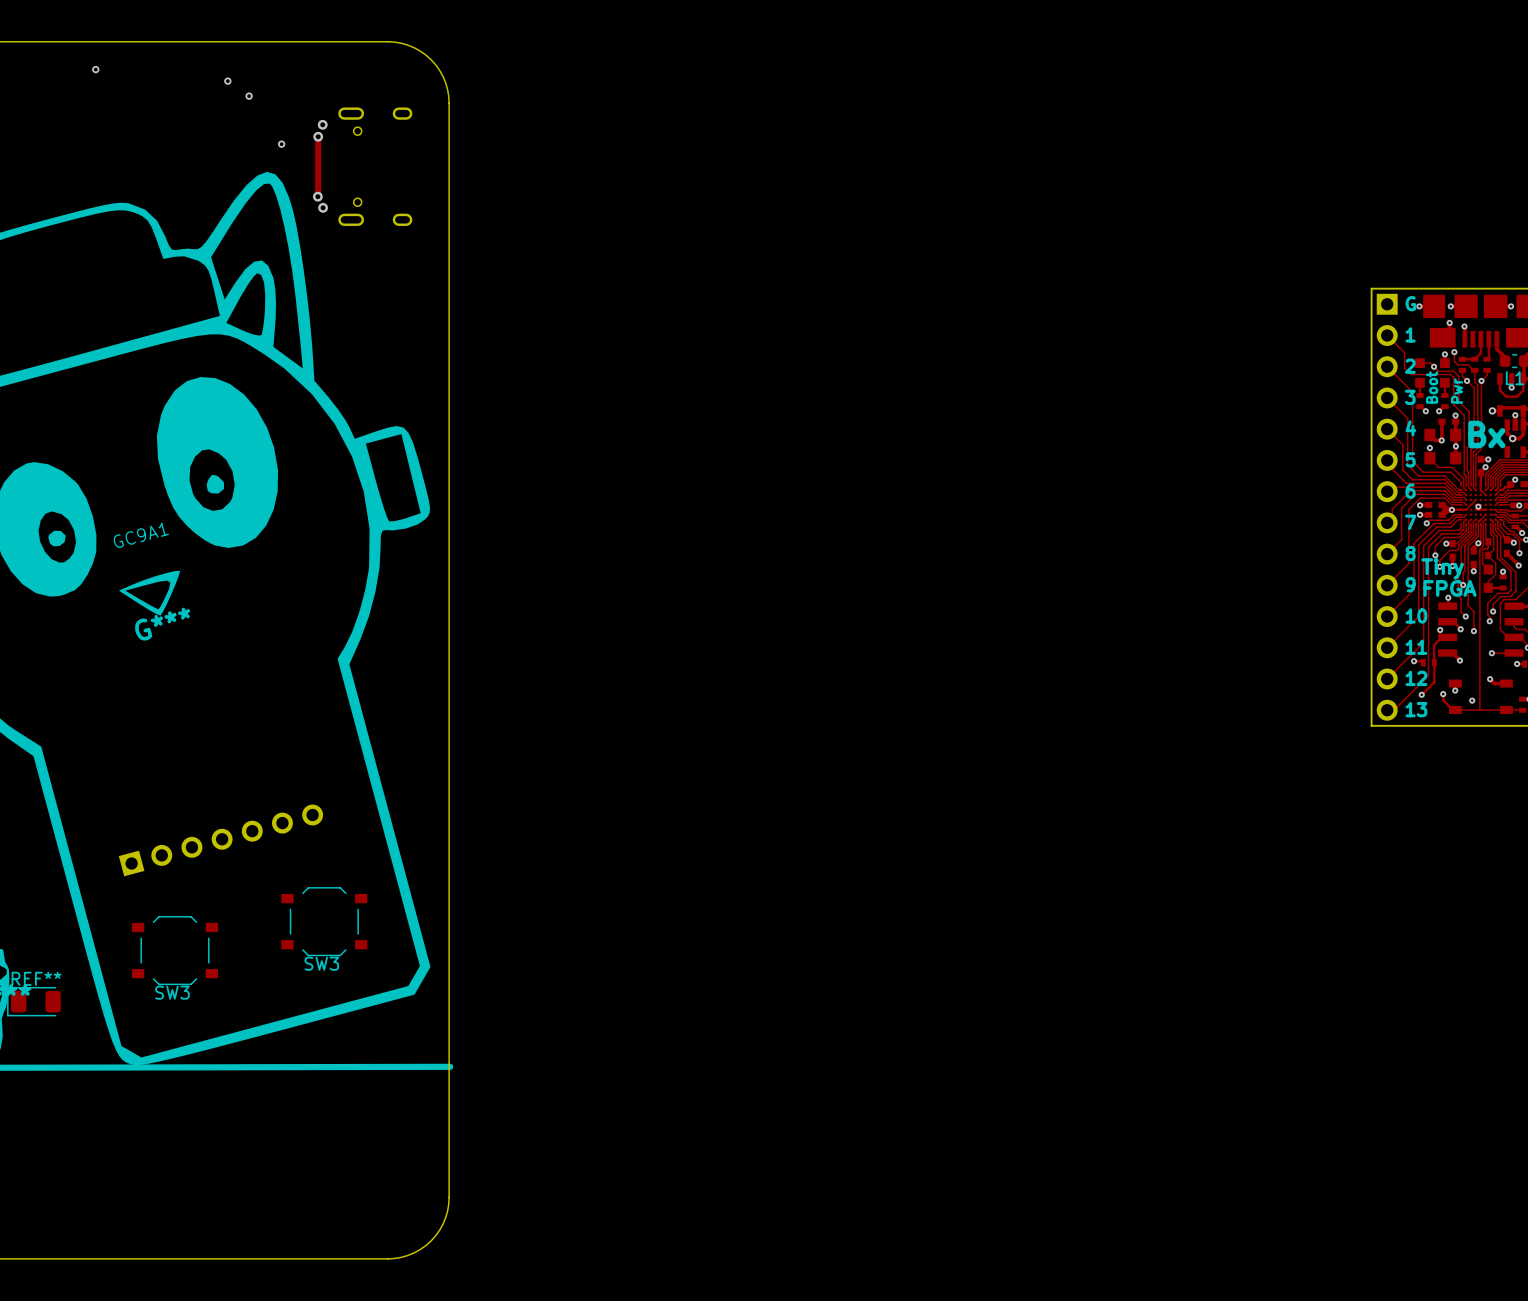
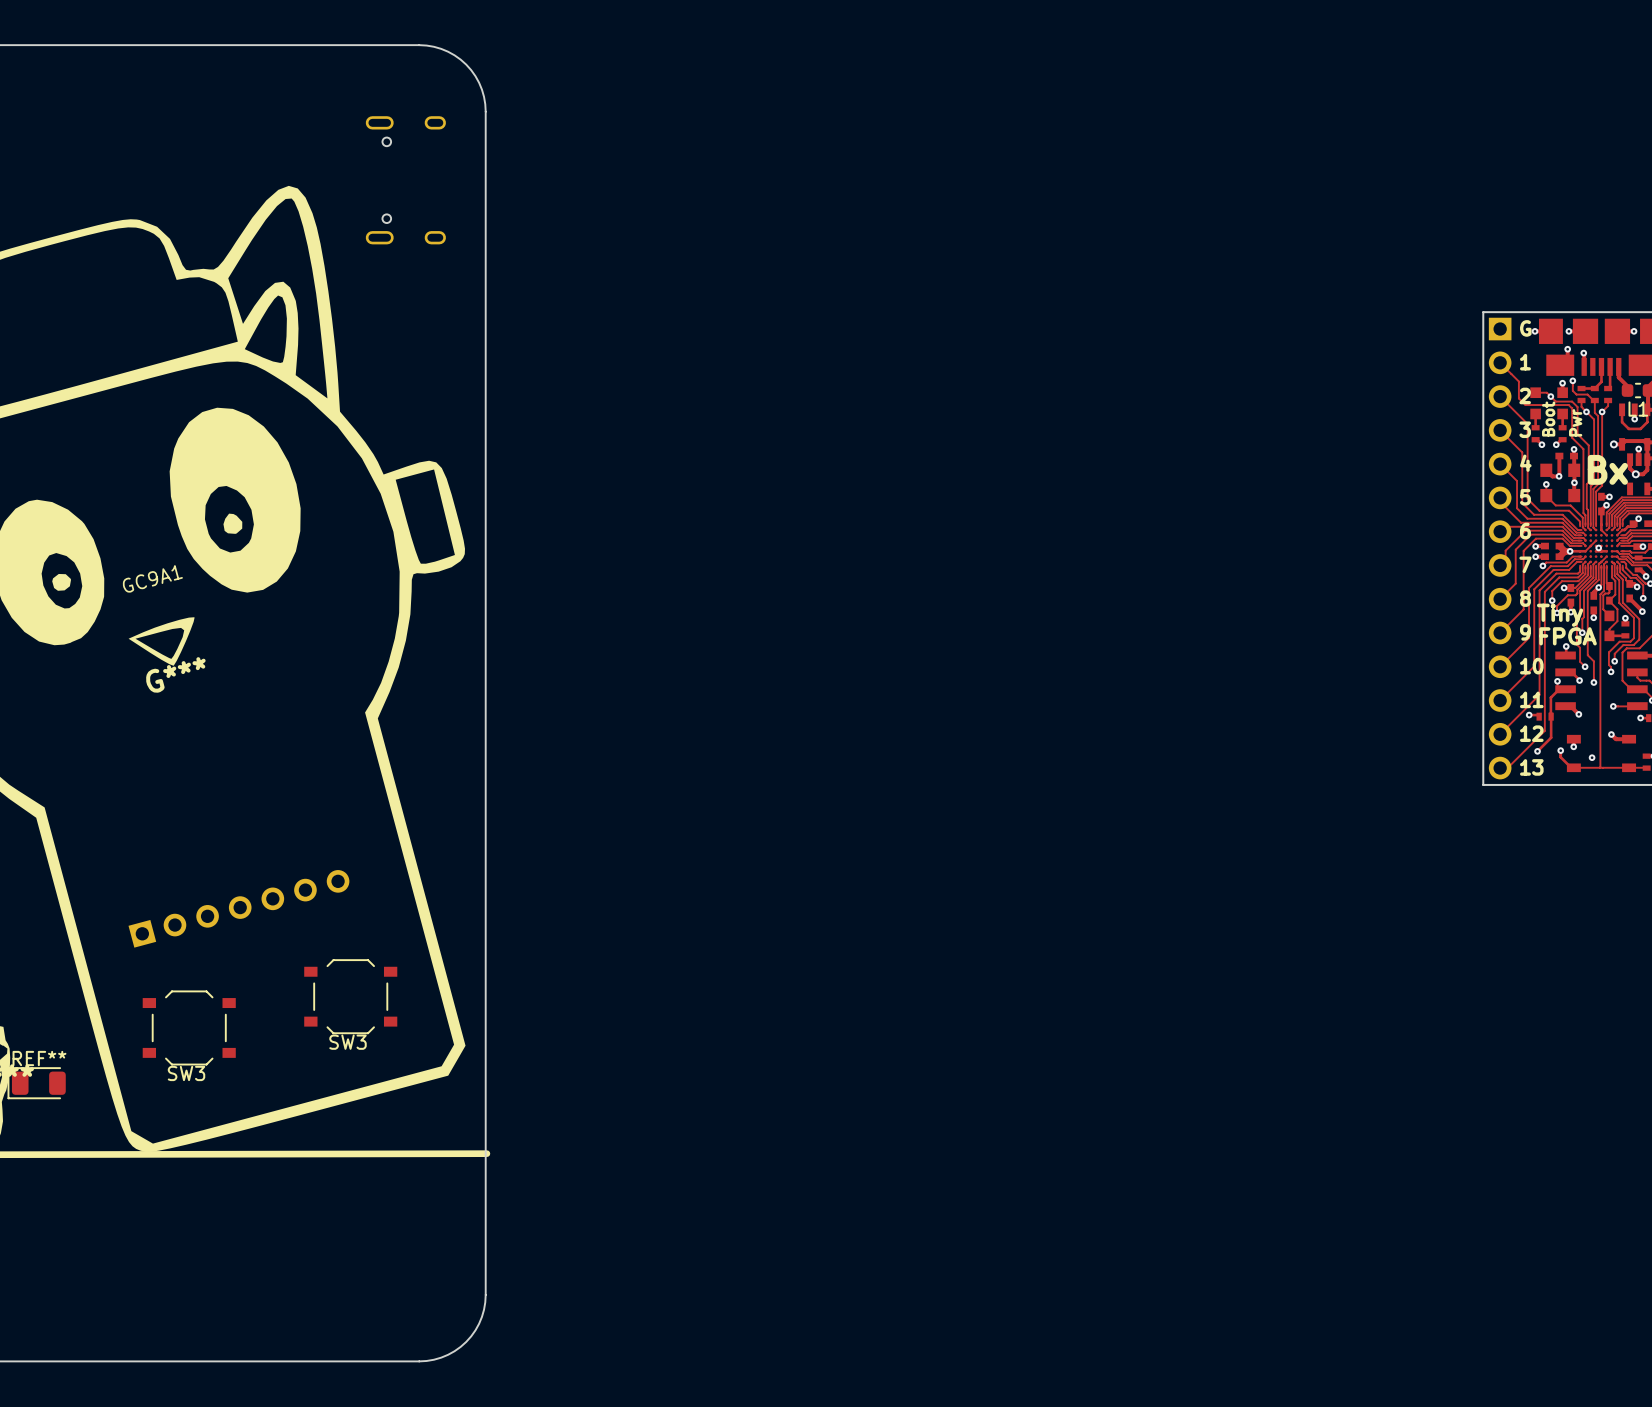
via: (95, 69) -> none
via: (227, 81) -> none
via: (249, 96) -> none
via: (322, 124) -> none
track: (318, 136) (318, 196) -> none
via: (318, 136) -> none
via: (281, 144) -> none
via: (317, 196) -> none
via: (323, 207) -> none

